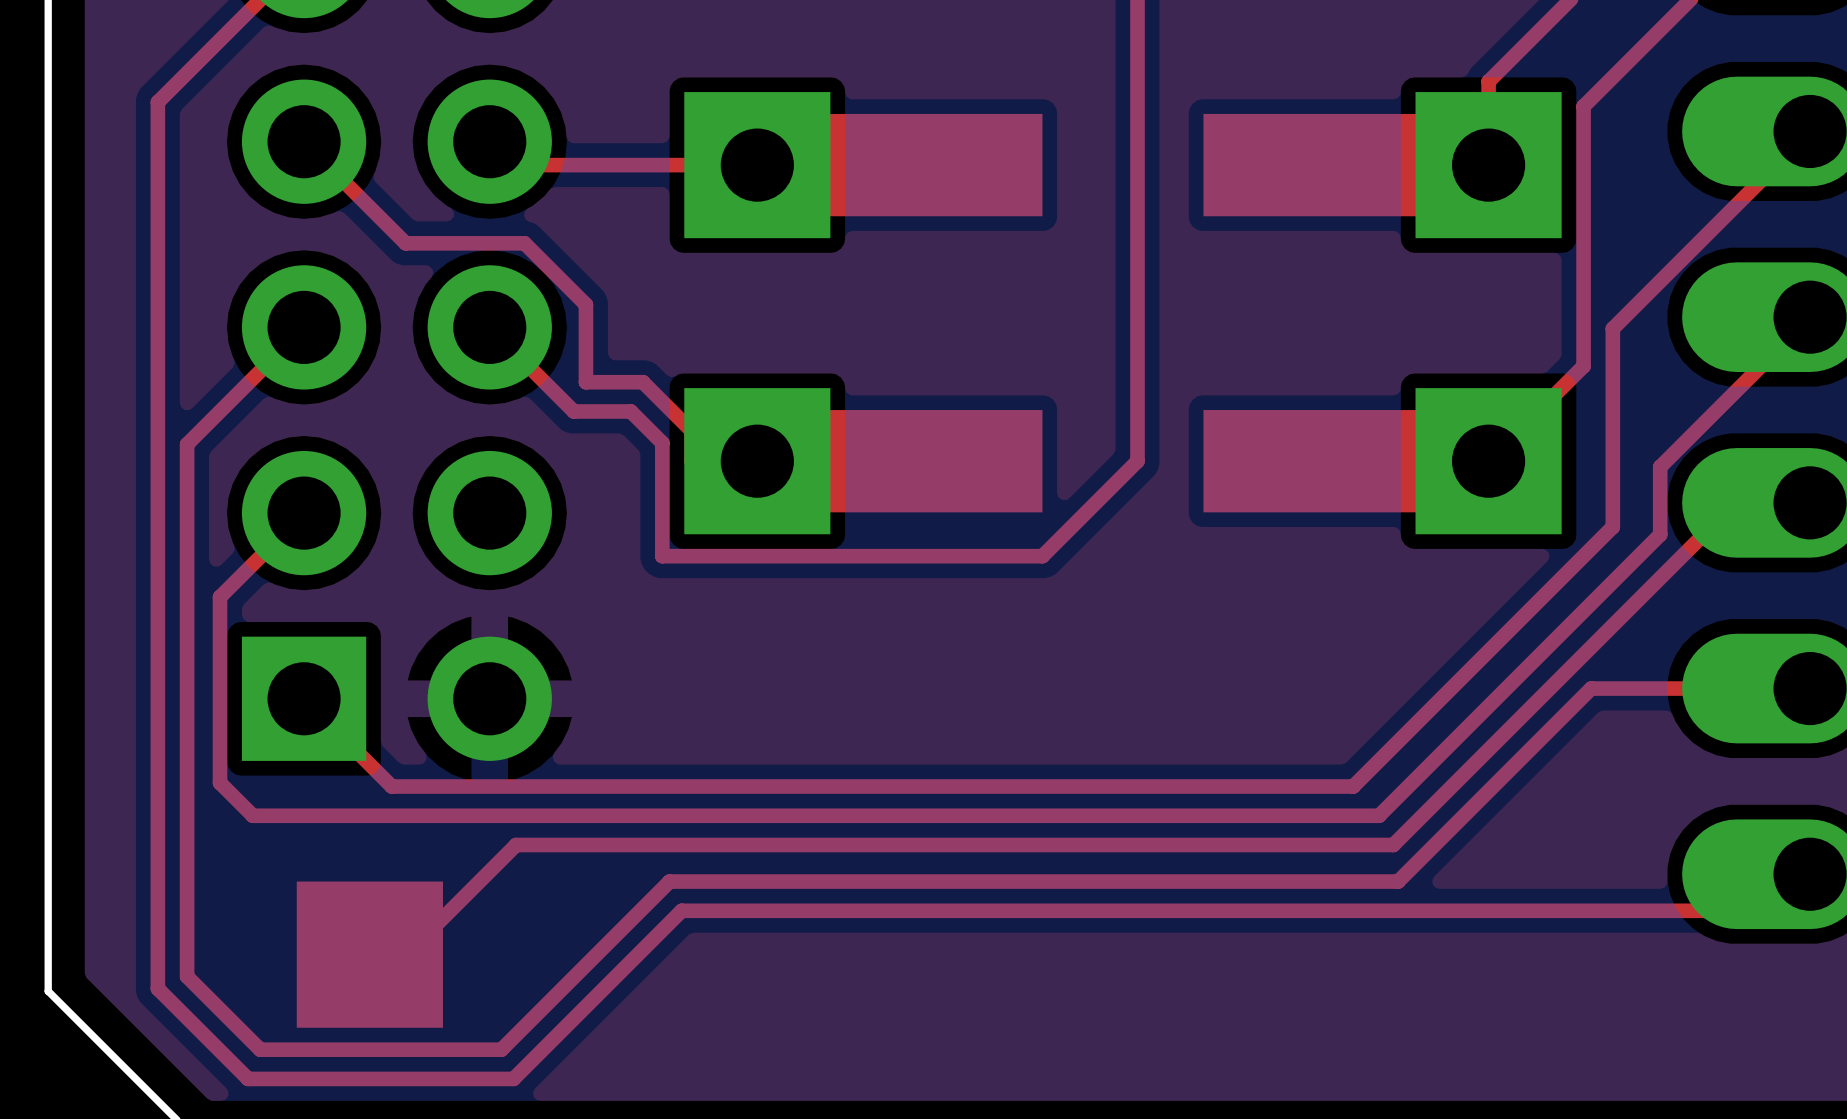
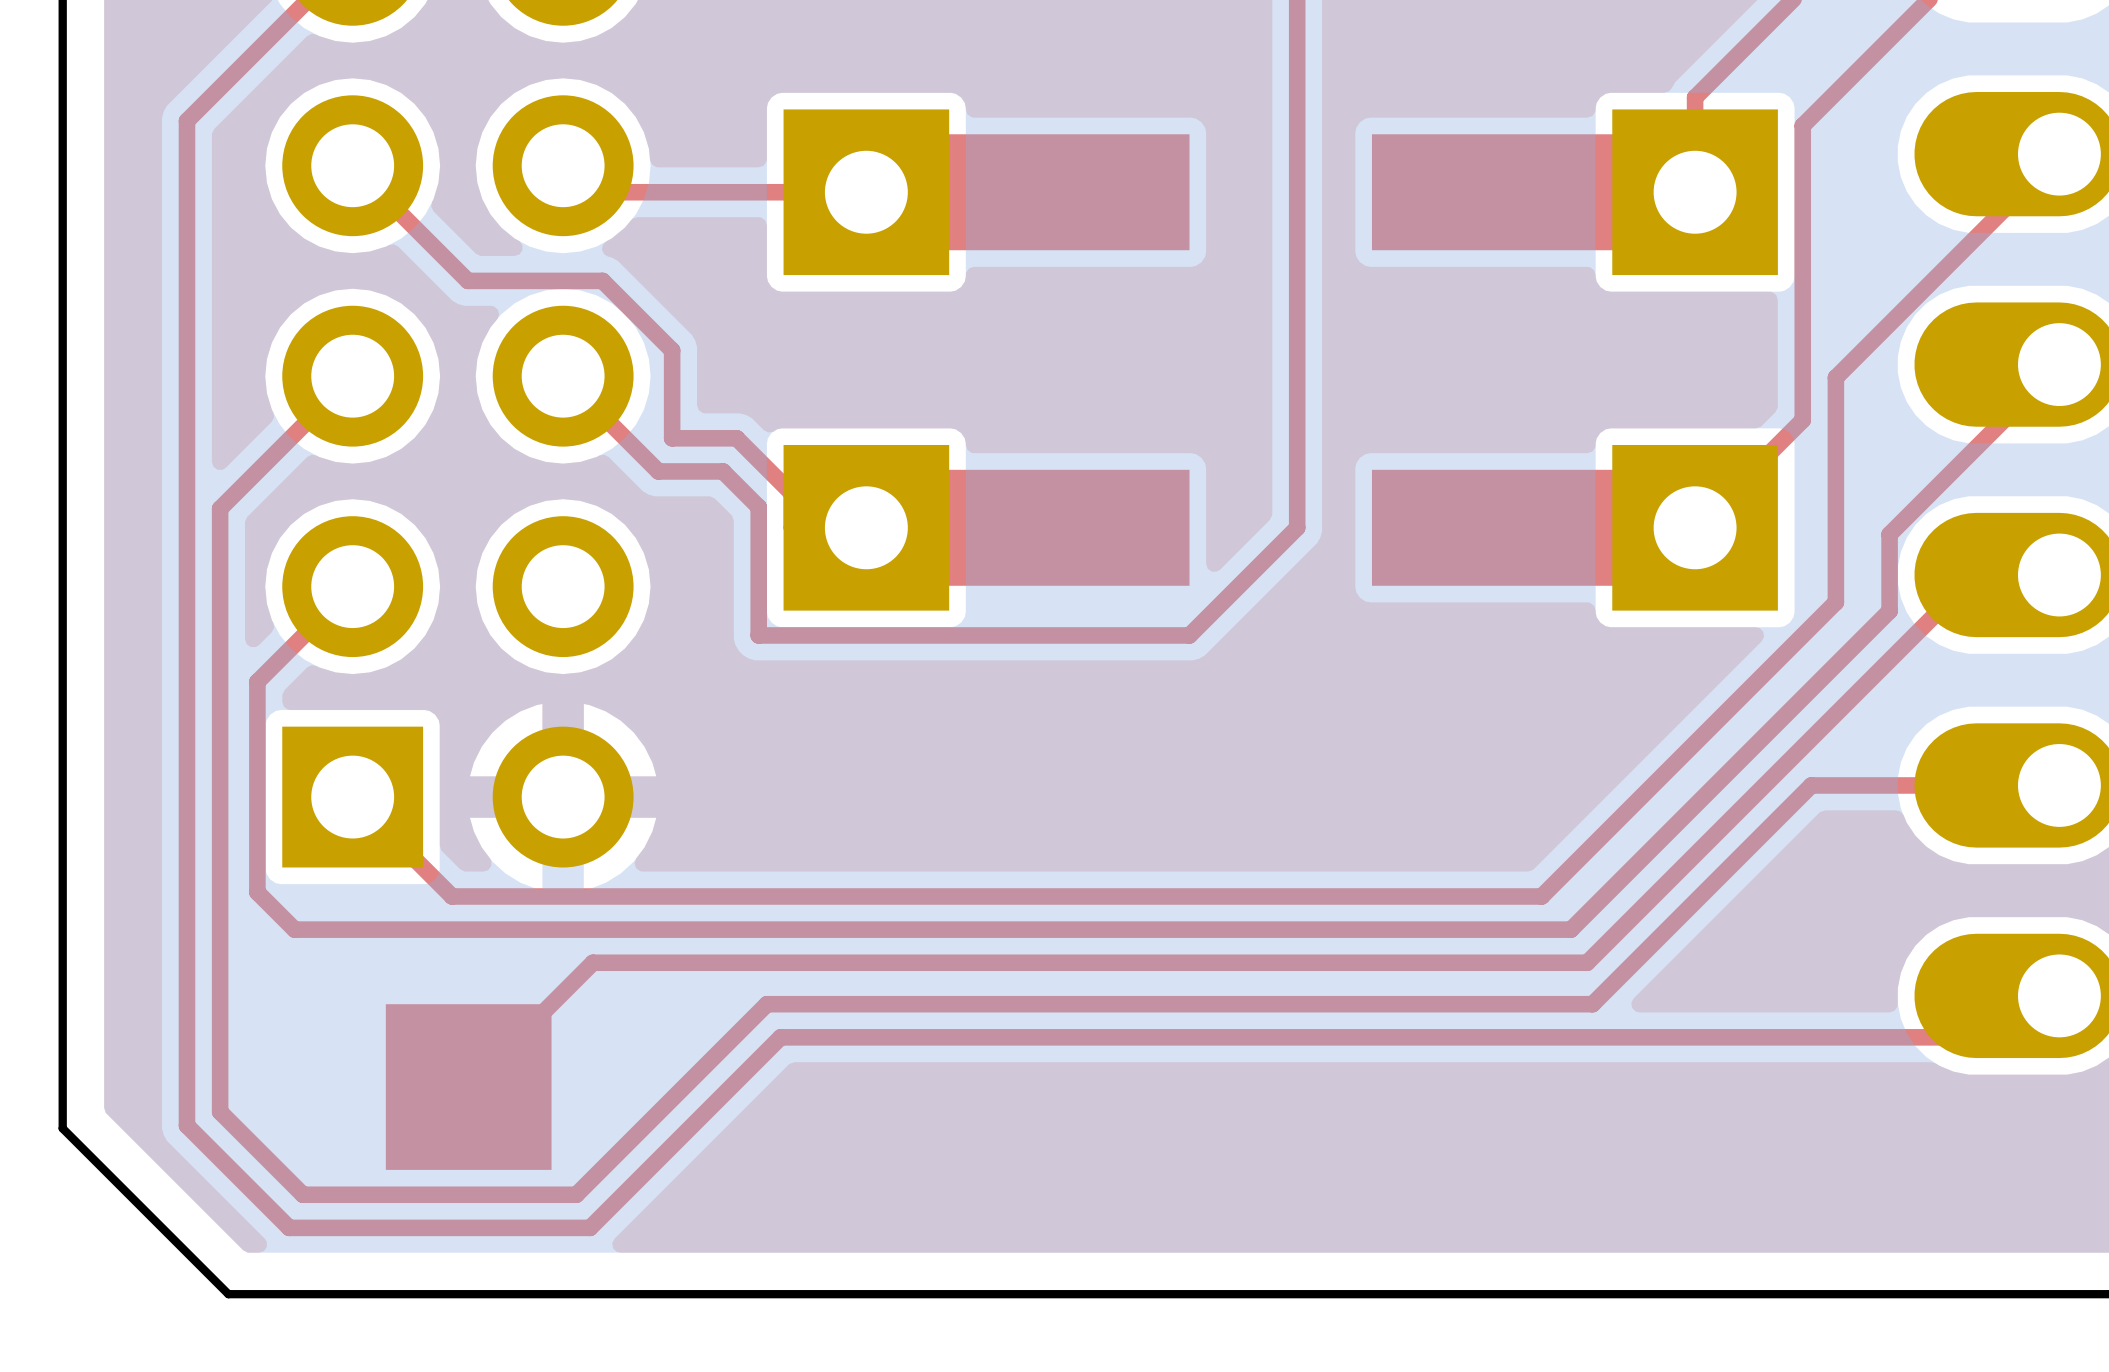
part position: (369, 954) -> (468, 1087)

